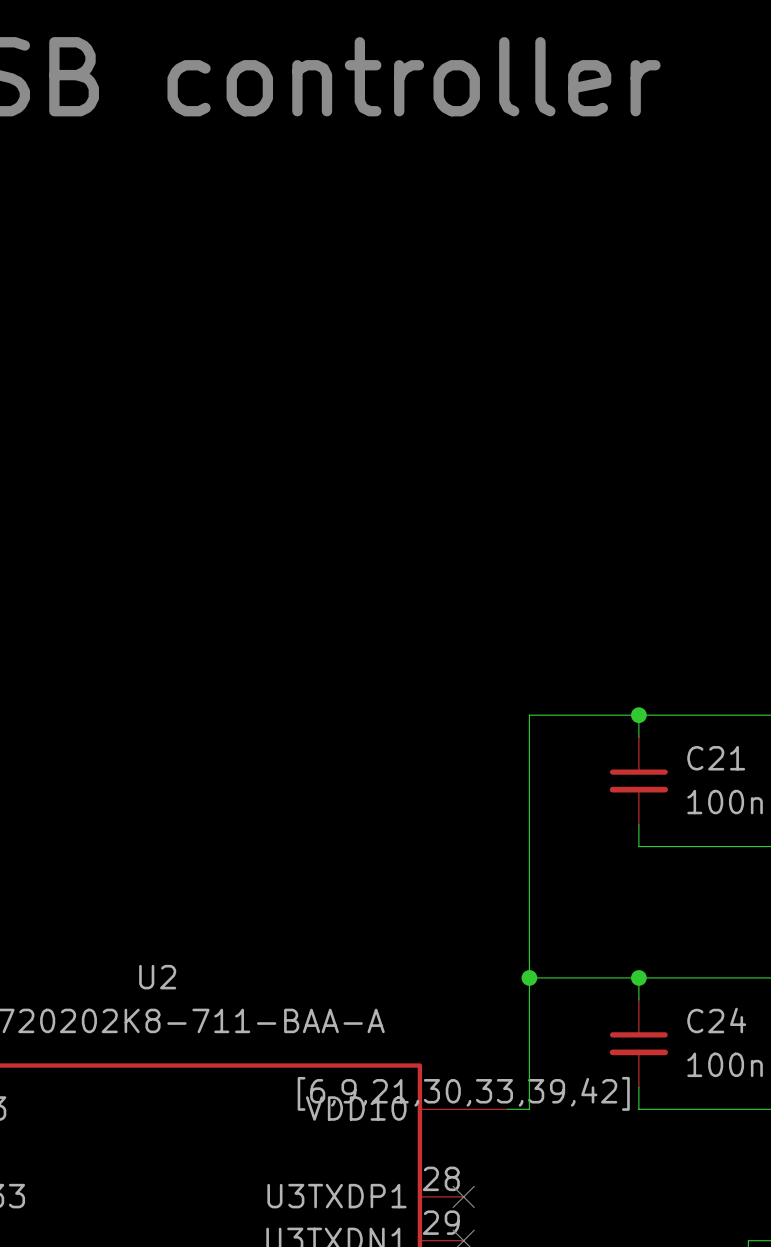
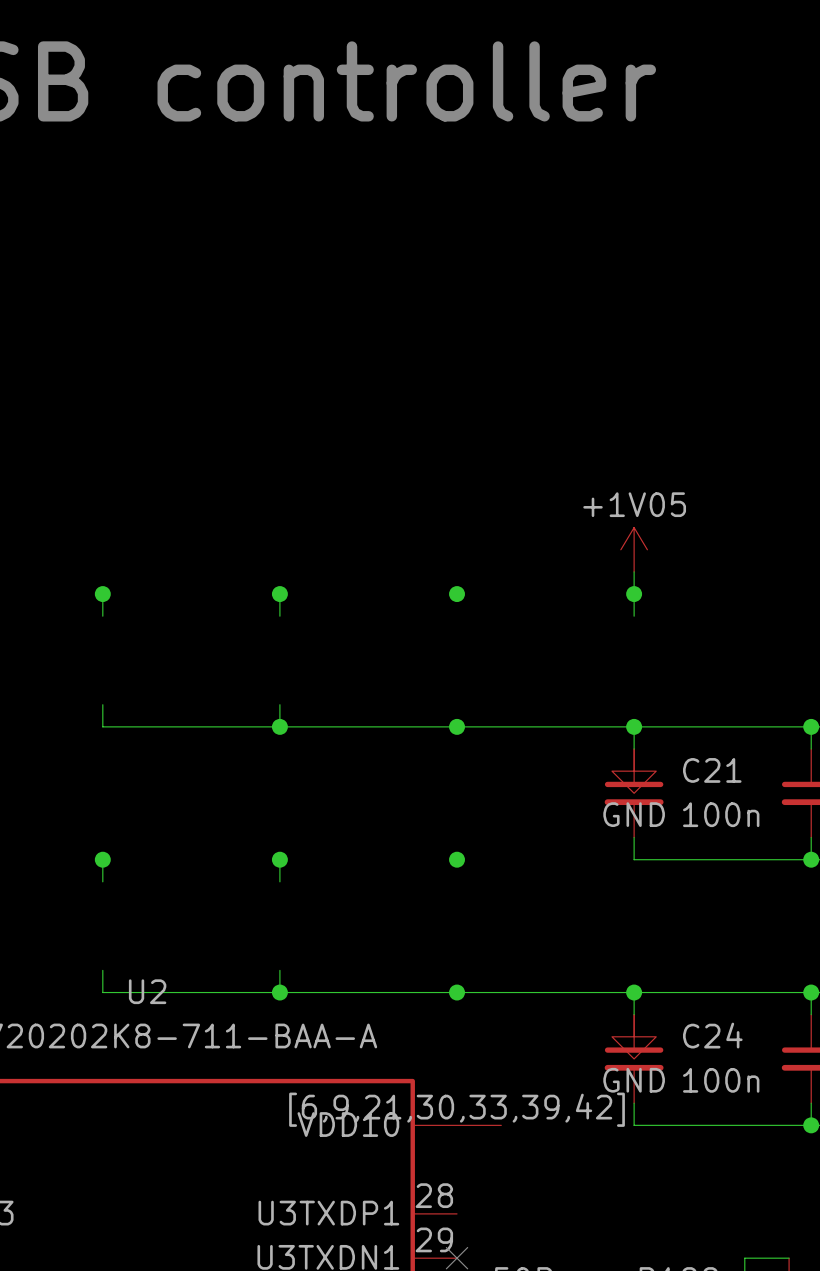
power symbol: none -> +1V05 (634, 549)
wire: none -> (634, 571) (634, 616)
wire: none -> (102, 594) (102, 616)
junction: none -> (102, 594)
wire: none -> (279, 594) (279, 616)
junction: none -> (279, 594)
junction: none -> (457, 594)
junction: none -> (634, 594)
wire: none -> (279, 704) (279, 726)
junction: none -> (279, 726)
junction: none -> (457, 726)
wire: (529, 715) (529, 1109) (507, 1109) -> (523, 726) (102, 726) (102, 704)
power symbol: none -> GND (634, 771)
wire: none -> (102, 859) (102, 881)
junction: none -> (102, 859)
wire: none -> (279, 859) (279, 881)
junction: none -> (279, 859)
junction: none -> (457, 859)
wire: none -> (102, 970) (102, 992) (523, 992)
wire: none -> (279, 970) (279, 992)
junction: none -> (279, 992)
junction position: (529, 977) -> (457, 992)
power symbol: none -> GND (634, 1036)
no-connect mark: (463, 1196) -> none

